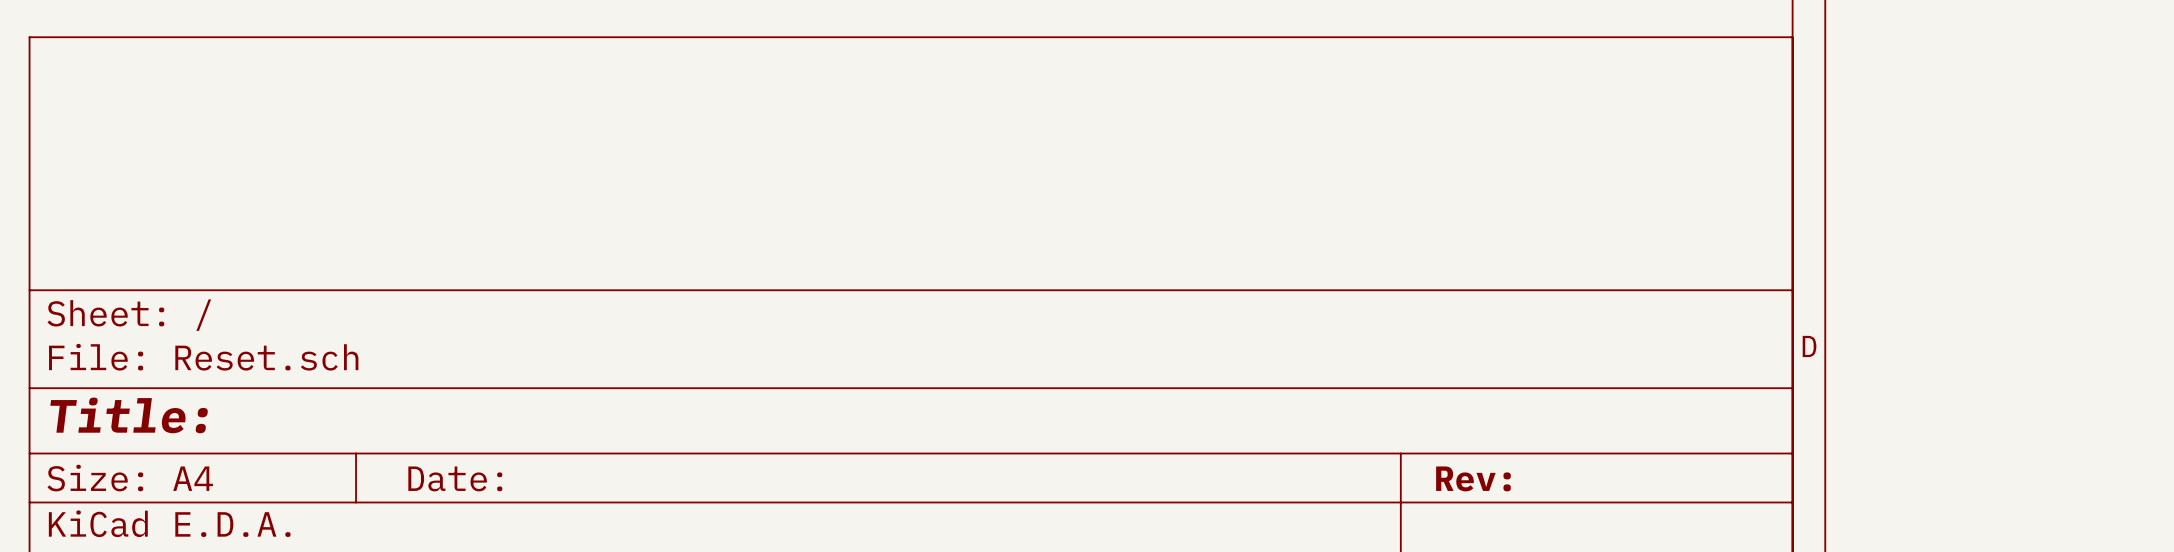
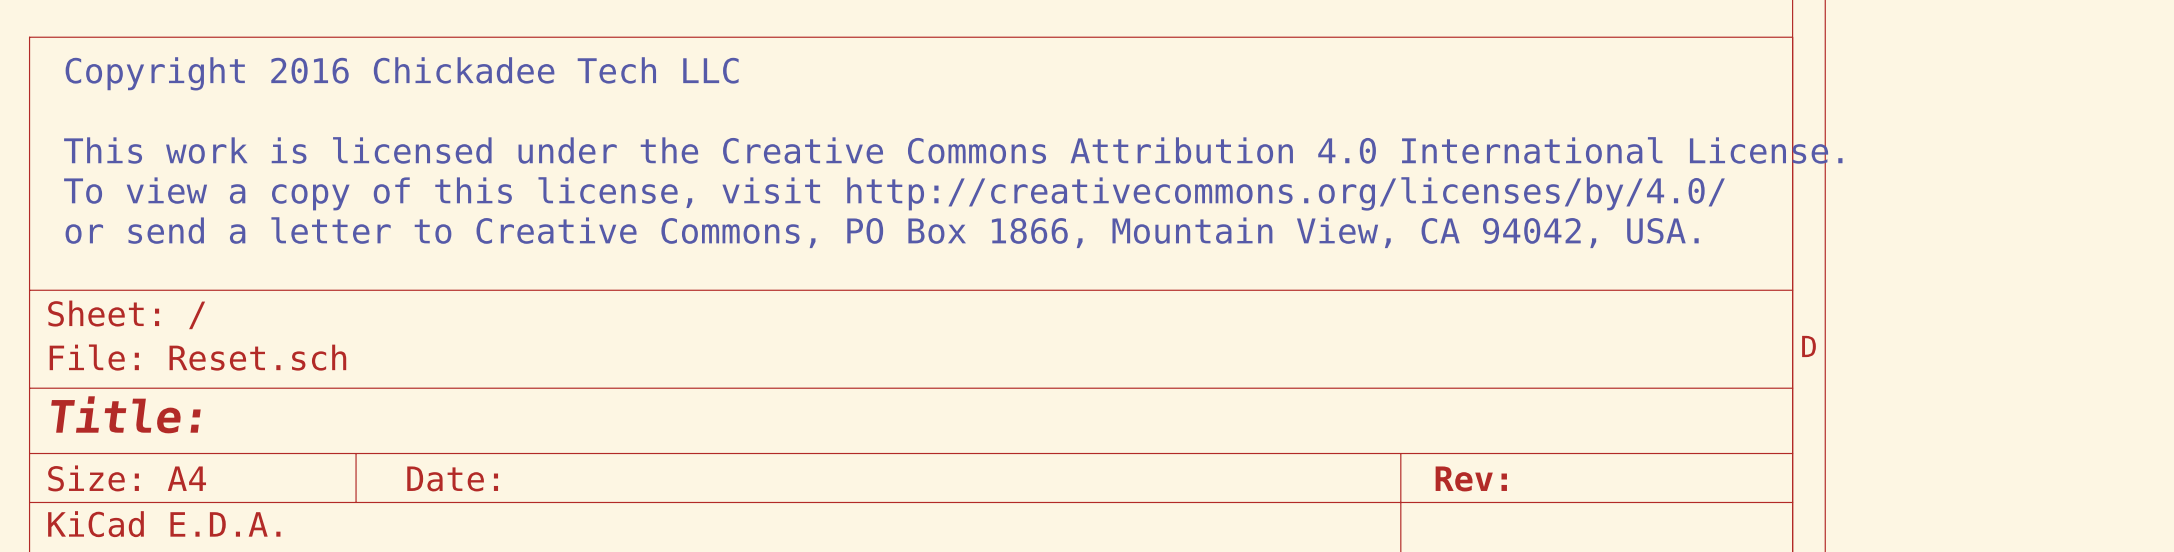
text: none -> Copyright 2016 Chickadee Tech LLC (402, 73)
text: none -> This work is licensed under the Creative Commons Attribution 4.0 International License. (953, 150)
text: none -> To view a copy of this license, visit http://creativecommons.org/licenses/by/4.0/ (894, 193)
text: none -> or send a letter to Creative Commons, PO Box 1866, Mountain View, CA 94042, USA. (882, 232)

